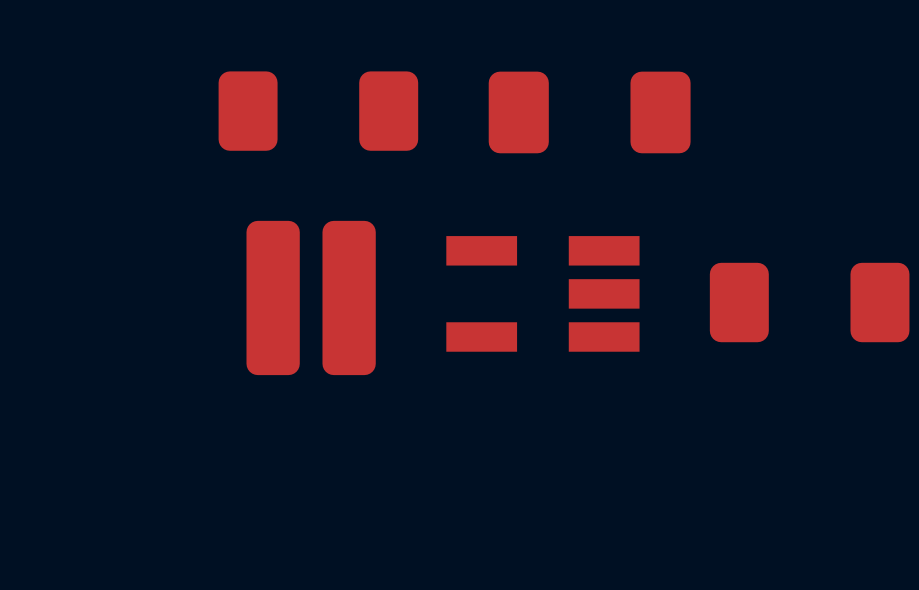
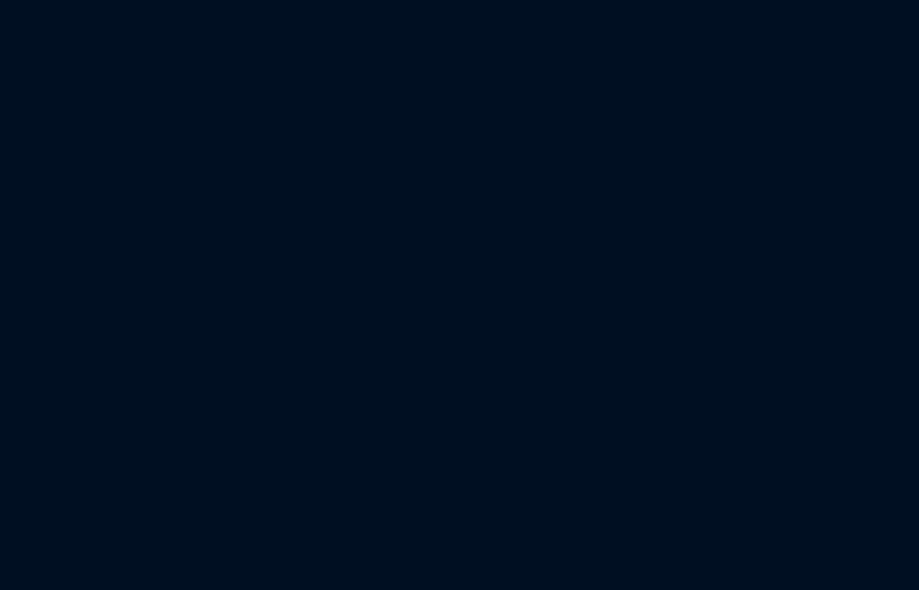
part: (318, 111) -> none
part: (589, 112) -> none
part: (542, 293) -> none
part: (311, 297) -> none
part: (809, 302) -> none

